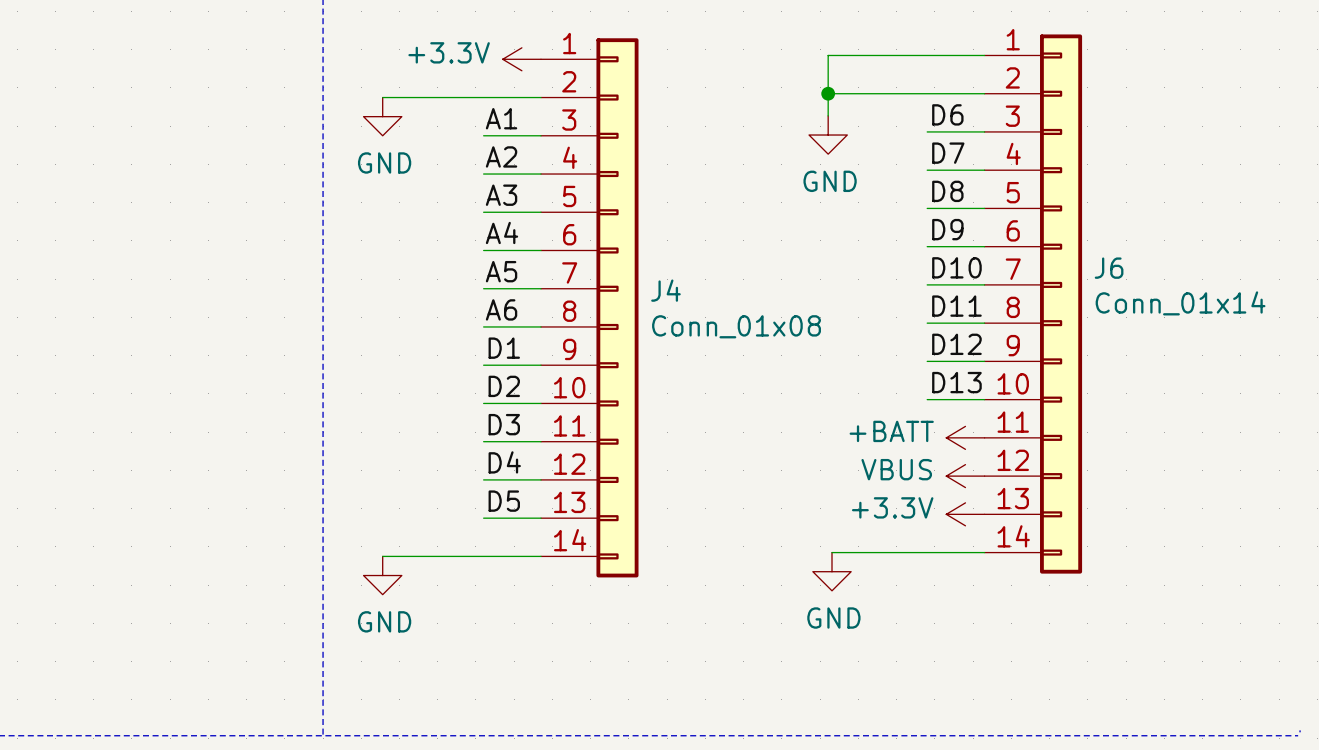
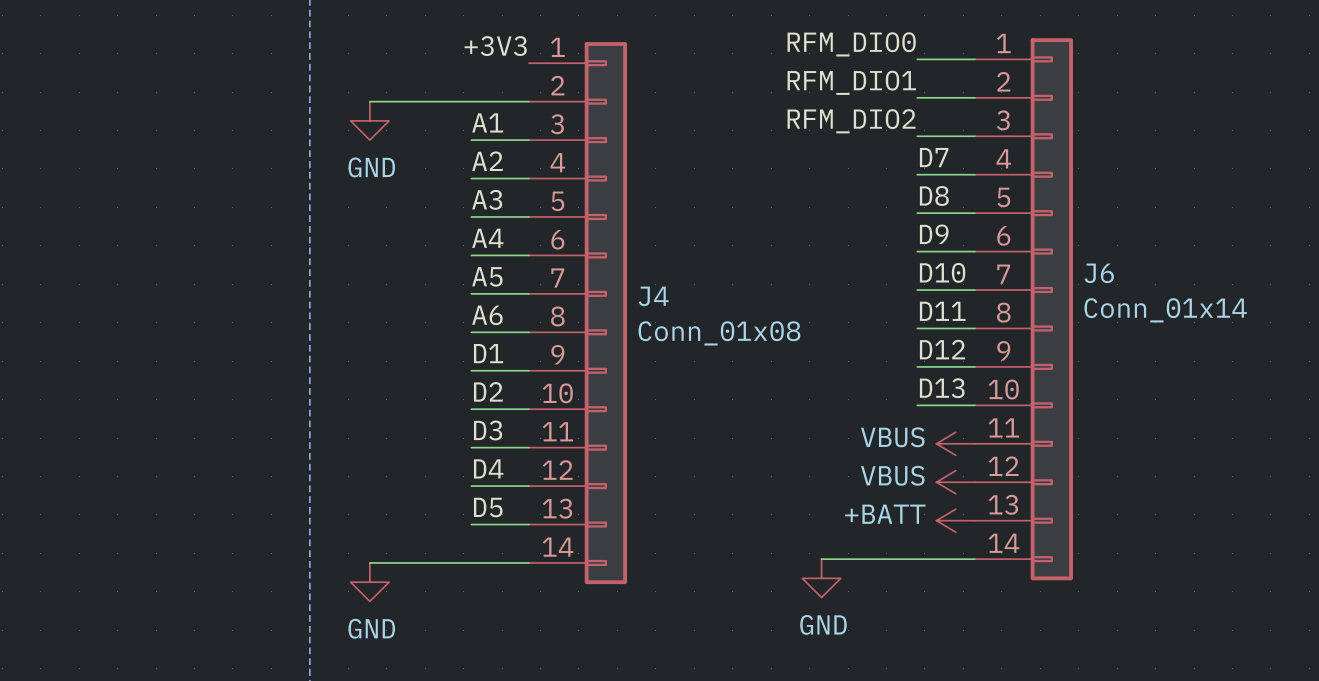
label: none -> RFM_DIO0 (851, 44)
label: none -> +3V3 (495, 46)
wire: (927, 55) (828, 55) (828, 115) -> none
power symbol: +3.3V (521, 59) -> none
label: none -> RFM_DIO1 (851, 82)
wire: (828, 93) (927, 93) -> none
junction: (828, 93) -> none
label: D6 (947, 114) -> RFM_DIO2 (851, 121)
power symbol: GND (828, 135) -> none
power symbol: +BATT (965, 437) -> VBUS (955, 443)
power symbol: +3.3V (965, 514) -> +BATT (955, 520)

